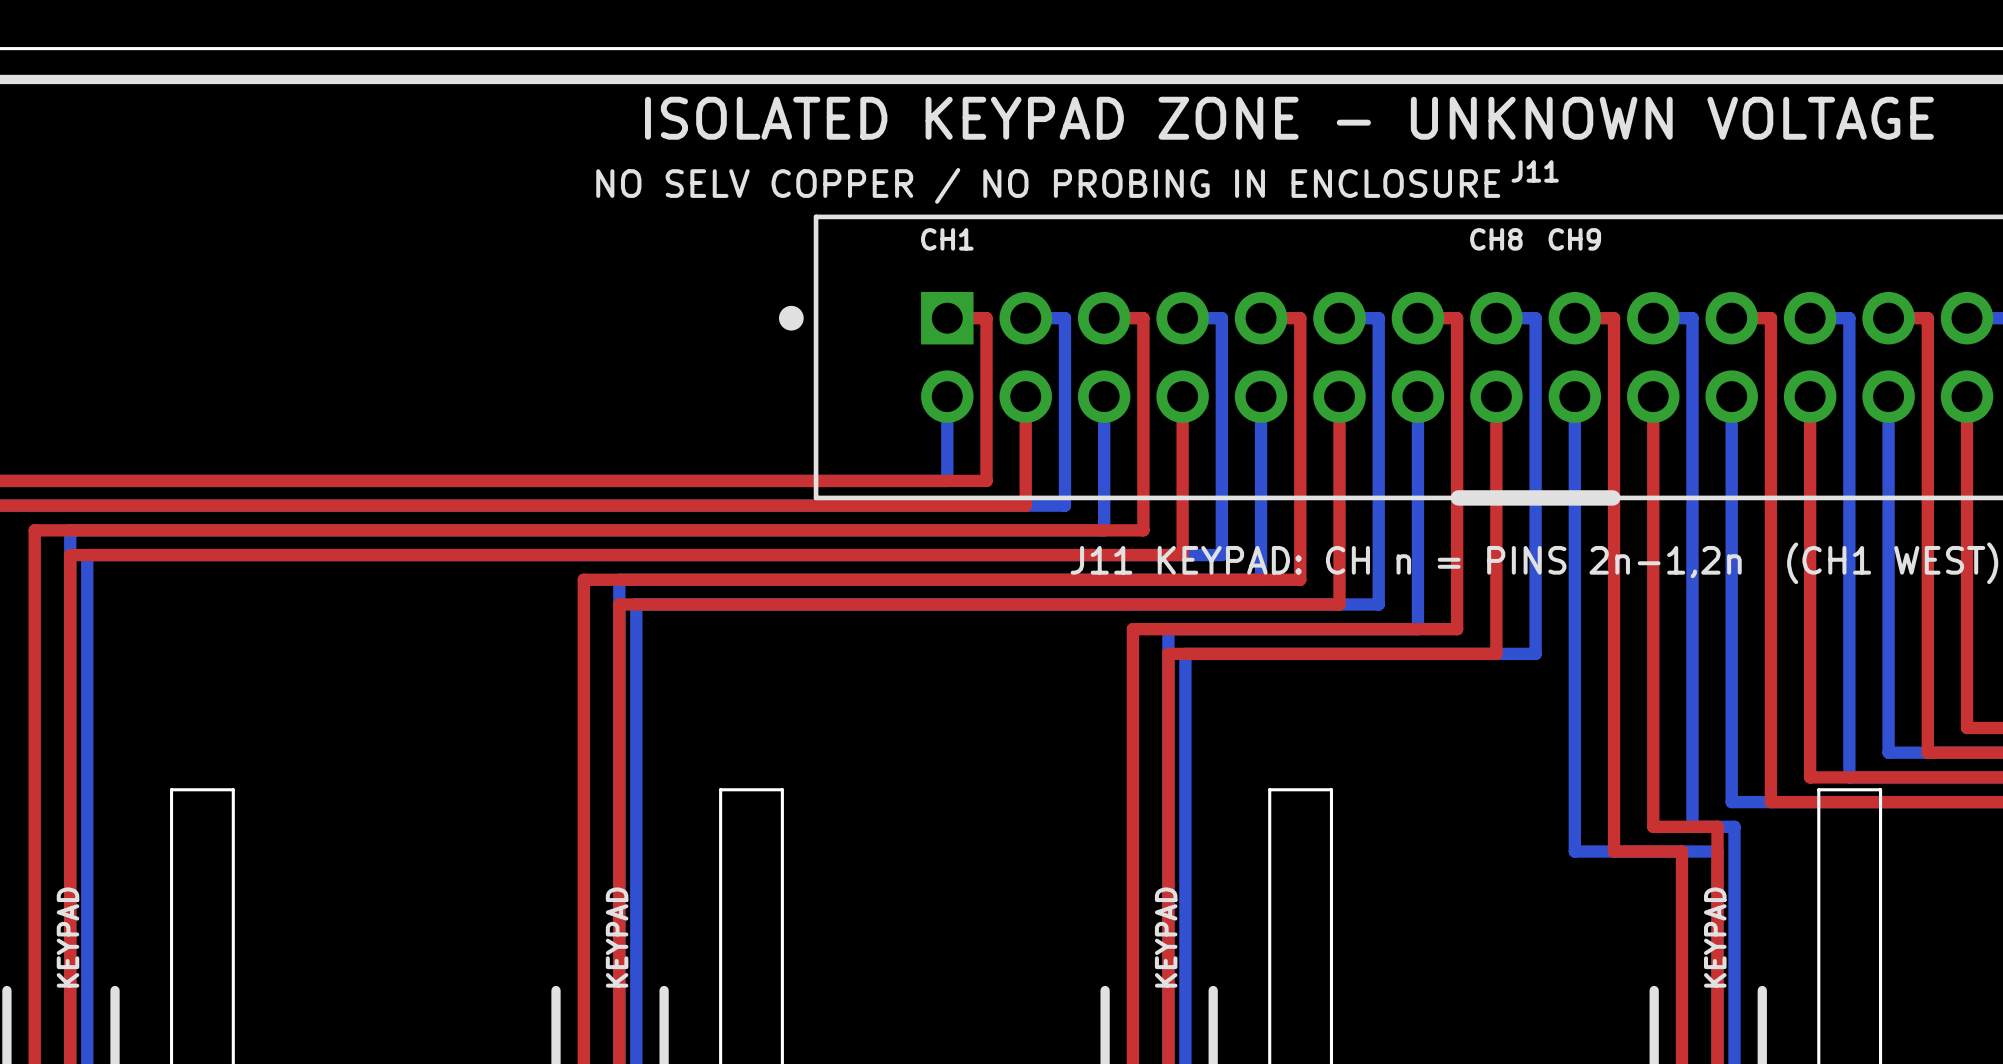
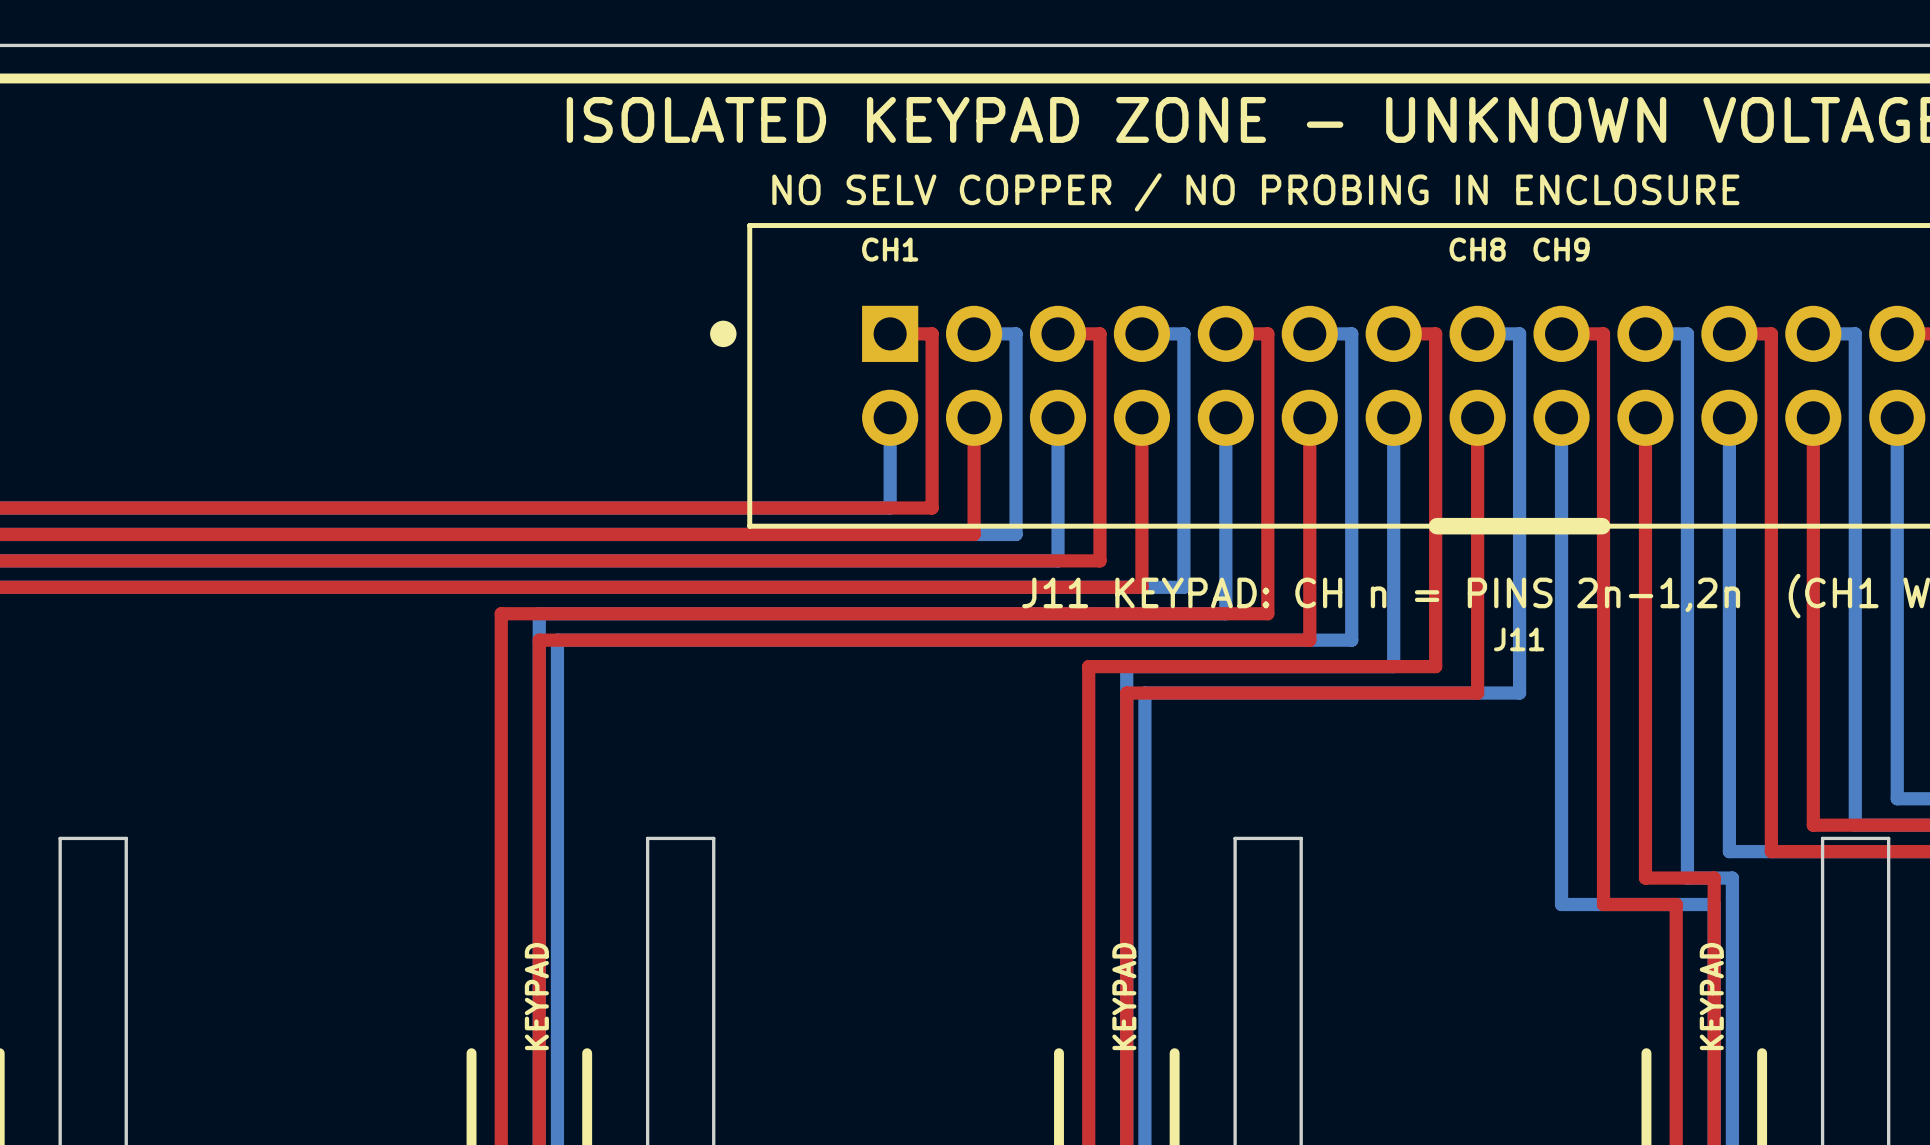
J11 name position: J11 (1535, 171) -> J11 (1519, 639)
text position: NO SELV COPPER / NO PROBING IN ENCLOSURE (1048, 185) -> NO SELV COPPER / NO PROBING IN ENCLOSURE (1255, 192)

